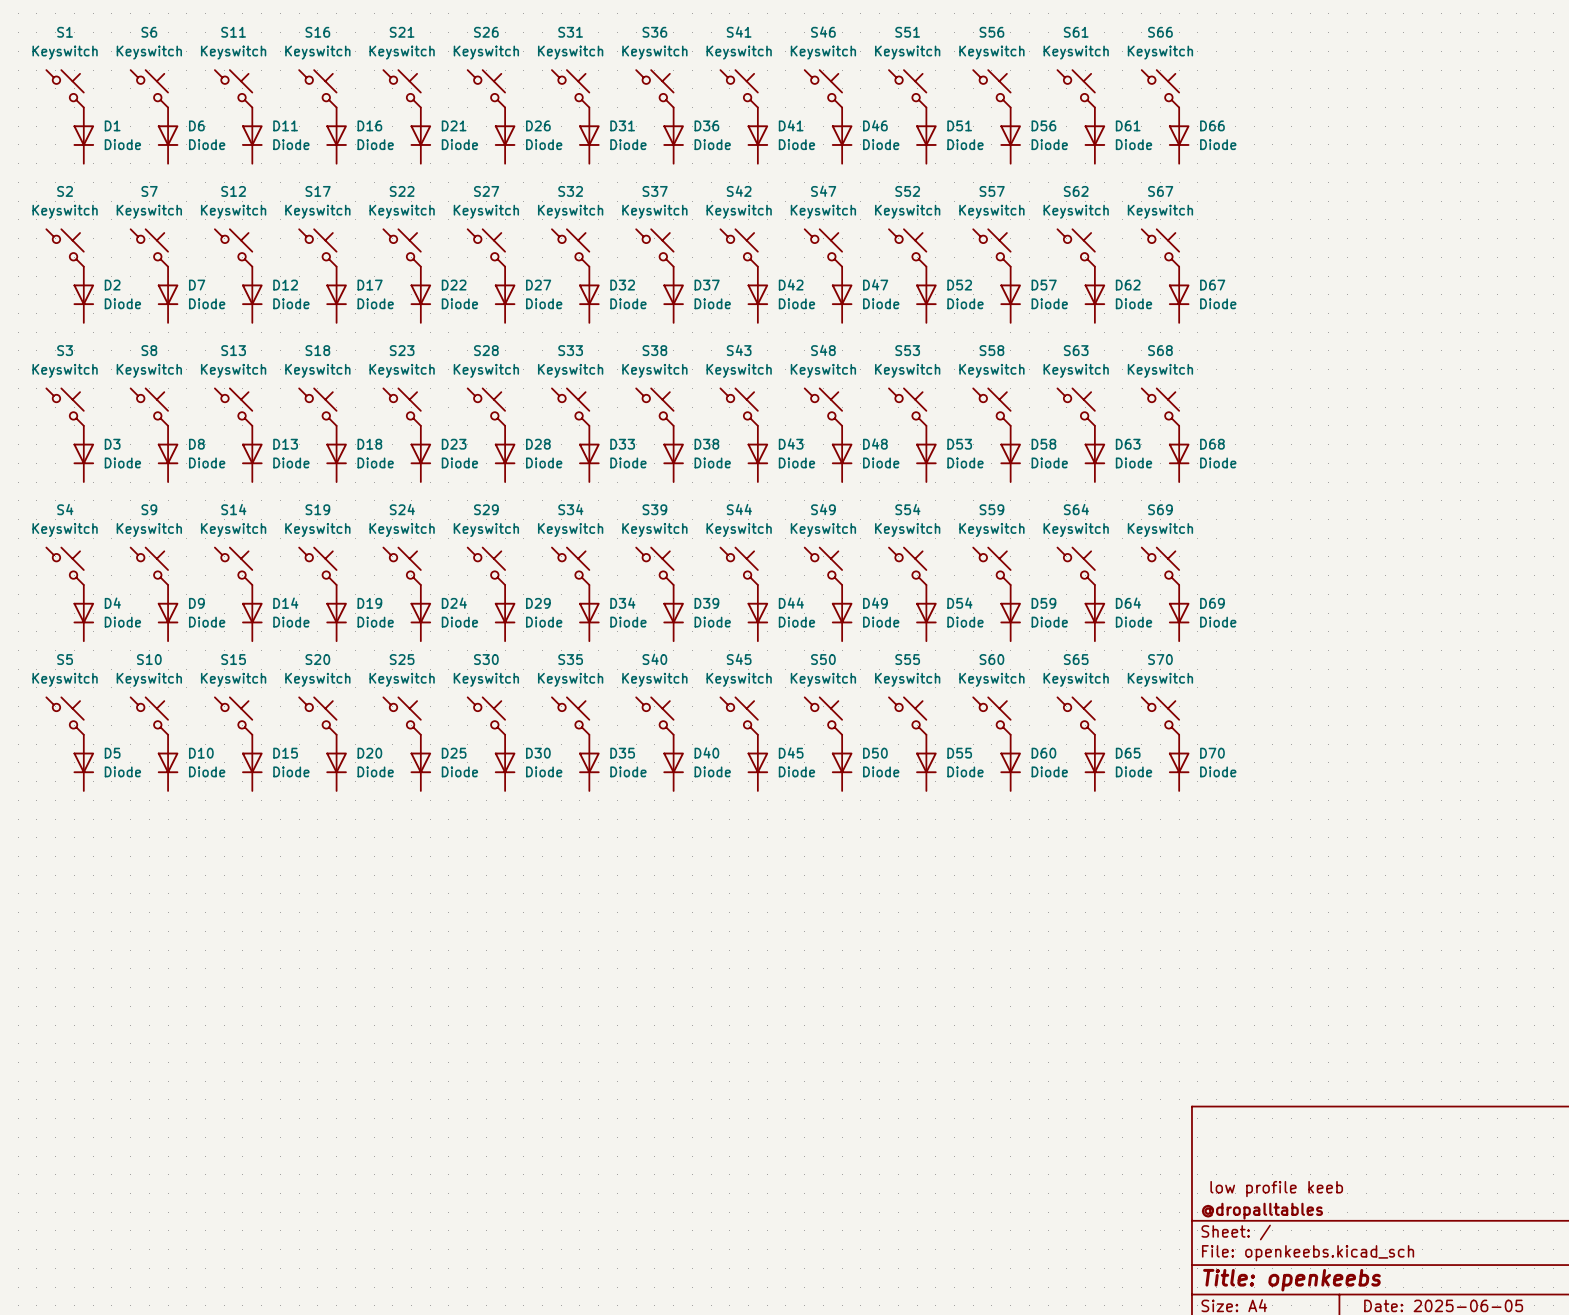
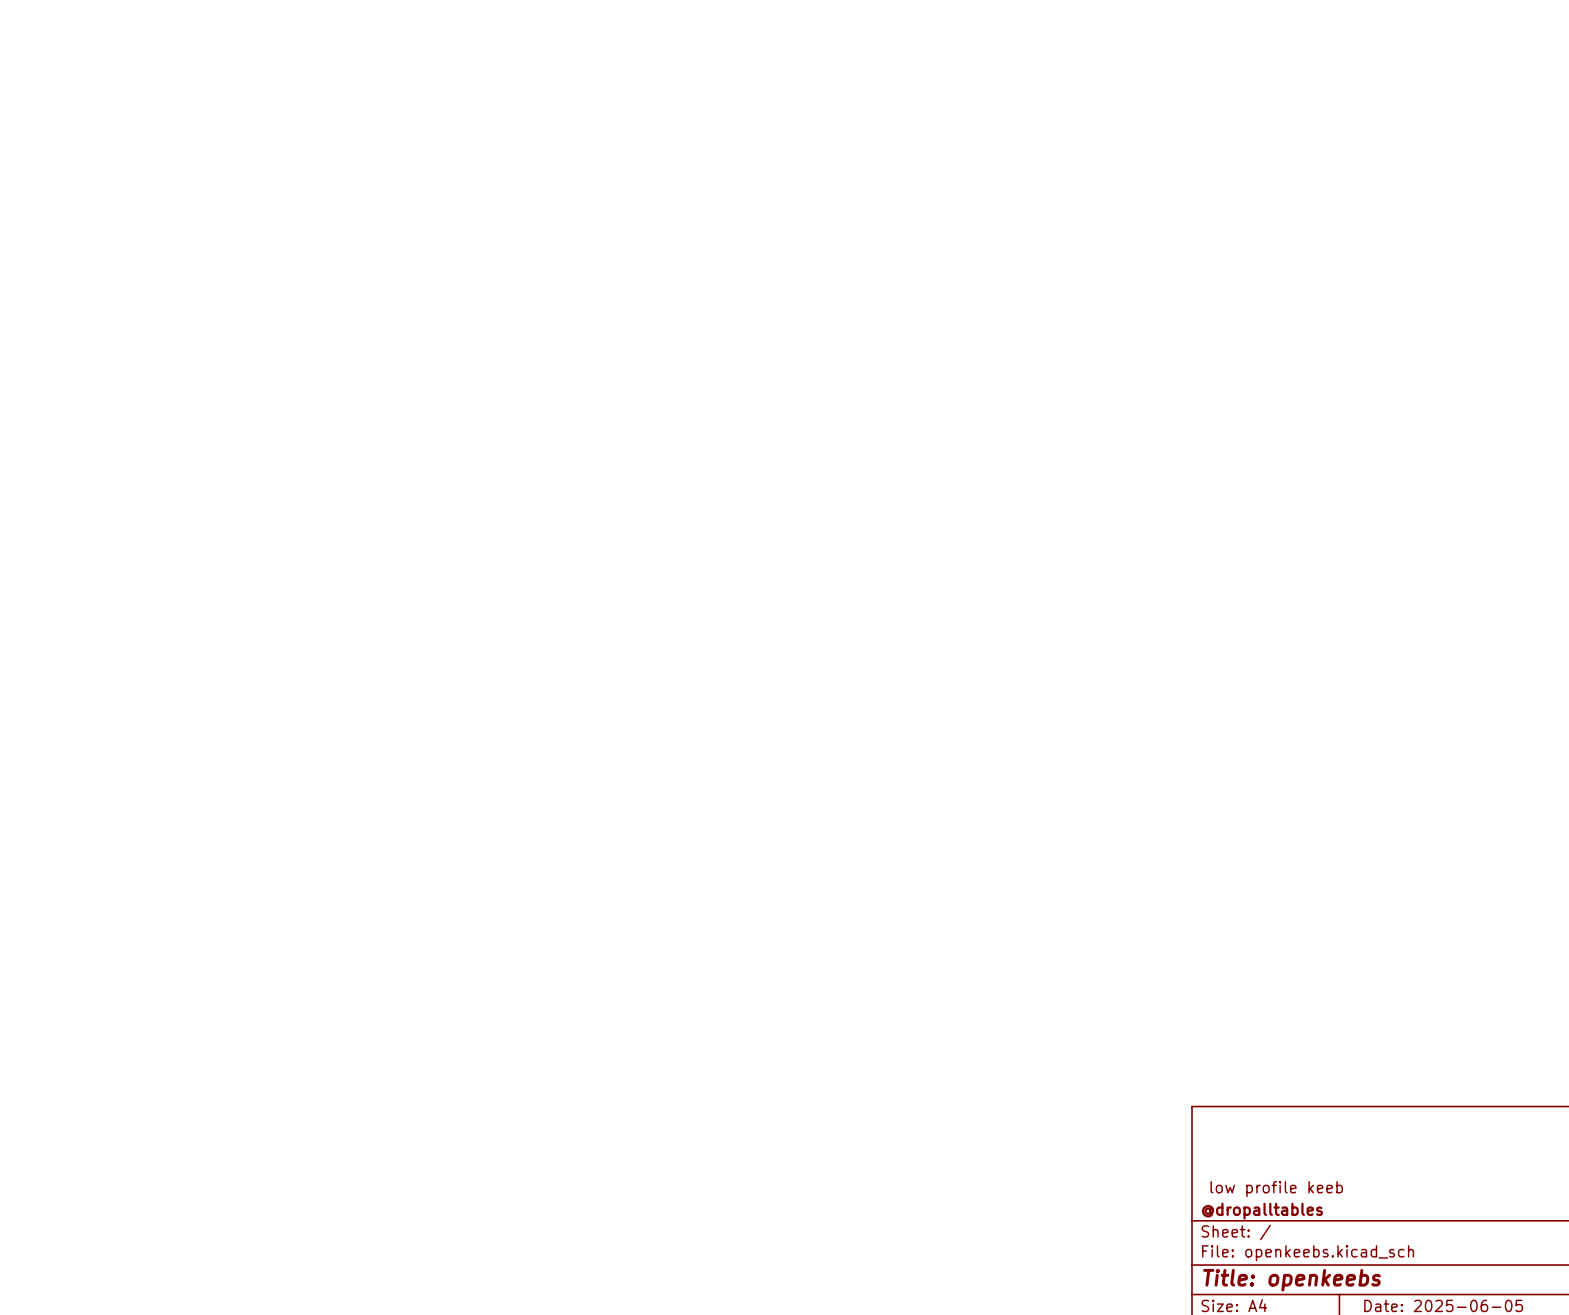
S1: Keyswitch (65, 88) -> none
S6: Keyswitch (149, 88) -> none
S11: Keyswitch (233, 88) -> none
S16: Keyswitch (317, 88) -> none
S21: Keyswitch (402, 88) -> none
S26: Keyswitch (486, 88) -> none
S31: Keyswitch (570, 88) -> none
S36: Keyswitch (654, 88) -> none
S41: Keyswitch (739, 88) -> none
S46: Keyswitch (823, 88) -> none
S51: Keyswitch (907, 88) -> none
S56: Keyswitch (991, 88) -> none
S61: Keyswitch (1076, 88) -> none
S66: Keyswitch (1160, 88) -> none
D1: Diode (83, 135) -> none
D6: Diode (168, 135) -> none
D11: Diode (252, 135) -> none
D16: Diode (336, 135) -> none
D21: Diode (420, 135) -> none
D26: Diode (505, 135) -> none
D31: Diode (589, 135) -> none
D36: Diode (673, 135) -> none
D41: Diode (757, 135) -> none
D46: Diode (842, 135) -> none
D51: Diode (926, 135) -> none
D56: Diode (1010, 135) -> none
D61: Diode (1094, 135) -> none
D66: Diode (1179, 135) -> none
S2: Keyswitch (65, 247) -> none
S7: Keyswitch (149, 247) -> none
S12: Keyswitch (233, 247) -> none
S17: Keyswitch (317, 247) -> none
S22: Keyswitch (402, 247) -> none
S27: Keyswitch (486, 247) -> none
S32: Keyswitch (570, 247) -> none
S37: Keyswitch (654, 247) -> none
S42: Keyswitch (739, 247) -> none
S47: Keyswitch (823, 247) -> none
S52: Keyswitch (907, 247) -> none
S57: Keyswitch (991, 247) -> none
S62: Keyswitch (1076, 247) -> none
S67: Keyswitch (1160, 247) -> none
D2: Diode (83, 294) -> none
D7: Diode (168, 294) -> none
D12: Diode (252, 294) -> none
D17: Diode (336, 294) -> none
D22: Diode (420, 294) -> none
D27: Diode (505, 294) -> none
D32: Diode (589, 294) -> none
D37: Diode (673, 294) -> none
D42: Diode (757, 294) -> none
D47: Diode (842, 294) -> none
D52: Diode (926, 294) -> none
D57: Diode (1010, 294) -> none
D62: Diode (1094, 294) -> none
D67: Diode (1179, 294) -> none
S3: Keyswitch (65, 407) -> none
S8: Keyswitch (149, 407) -> none
S13: Keyswitch (233, 407) -> none
S18: Keyswitch (317, 407) -> none
S23: Keyswitch (402, 407) -> none
S28: Keyswitch (486, 407) -> none
S33: Keyswitch (570, 407) -> none
S38: Keyswitch (654, 407) -> none
S43: Keyswitch (739, 407) -> none
S48: Keyswitch (823, 407) -> none
S53: Keyswitch (907, 407) -> none
S58: Keyswitch (991, 407) -> none
S63: Keyswitch (1076, 407) -> none
S68: Keyswitch (1160, 407) -> none
D3: Diode (83, 453) -> none
D8: Diode (168, 453) -> none
D13: Diode (252, 453) -> none
D18: Diode (336, 453) -> none
D23: Diode (420, 453) -> none
D28: Diode (505, 453) -> none
D33: Diode (589, 453) -> none
D38: Diode (673, 453) -> none
D43: Diode (757, 453) -> none
D48: Diode (842, 453) -> none
D53: Diode (926, 453) -> none
D58: Diode (1010, 453) -> none
D63: Diode (1094, 453) -> none
D68: Diode (1179, 453) -> none
S4: Keyswitch (65, 566) -> none
S9: Keyswitch (149, 566) -> none
S14: Keyswitch (233, 566) -> none
S19: Keyswitch (317, 566) -> none
S24: Keyswitch (402, 566) -> none
S29: Keyswitch (486, 566) -> none
S34: Keyswitch (570, 566) -> none
S39: Keyswitch (654, 566) -> none
S44: Keyswitch (739, 566) -> none
S49: Keyswitch (823, 566) -> none
S54: Keyswitch (907, 566) -> none
S59: Keyswitch (991, 566) -> none
S64: Keyswitch (1076, 566) -> none
S69: Keyswitch (1160, 566) -> none
D4: Diode (83, 613) -> none
D9: Diode (168, 613) -> none
D14: Diode (252, 613) -> none
D19: Diode (336, 613) -> none
D24: Diode (420, 613) -> none
D29: Diode (505, 613) -> none
D34: Diode (589, 613) -> none
D39: Diode (673, 613) -> none
D44: Diode (757, 613) -> none
D49: Diode (842, 613) -> none
D54: Diode (926, 613) -> none
D59: Diode (1010, 613) -> none
D64: Diode (1094, 613) -> none
D69: Diode (1179, 613) -> none
S5: Keyswitch (65, 716) -> none
S10: Keyswitch (149, 716) -> none
S15: Keyswitch (233, 716) -> none
S20: Keyswitch (317, 716) -> none
S25: Keyswitch (402, 716) -> none
S30: Keyswitch (486, 716) -> none
S35: Keyswitch (570, 716) -> none
S40: Keyswitch (654, 716) -> none
S45: Keyswitch (739, 716) -> none
S50: Keyswitch (823, 716) -> none
S55: Keyswitch (907, 716) -> none
S60: Keyswitch (991, 716) -> none
S65: Keyswitch (1076, 716) -> none
S70: Keyswitch (1160, 716) -> none
D5: Diode (83, 762) -> none
D10: Diode (168, 762) -> none
D15: Diode (252, 762) -> none
D20: Diode (336, 762) -> none
D25: Diode (420, 762) -> none
D30: Diode (505, 762) -> none
D35: Diode (589, 762) -> none
D40: Diode (673, 762) -> none
D45: Diode (757, 762) -> none
D50: Diode (842, 762) -> none
D55: Diode (926, 762) -> none
D60: Diode (1010, 762) -> none
D65: Diode (1094, 762) -> none
D70: Diode (1179, 762) -> none

